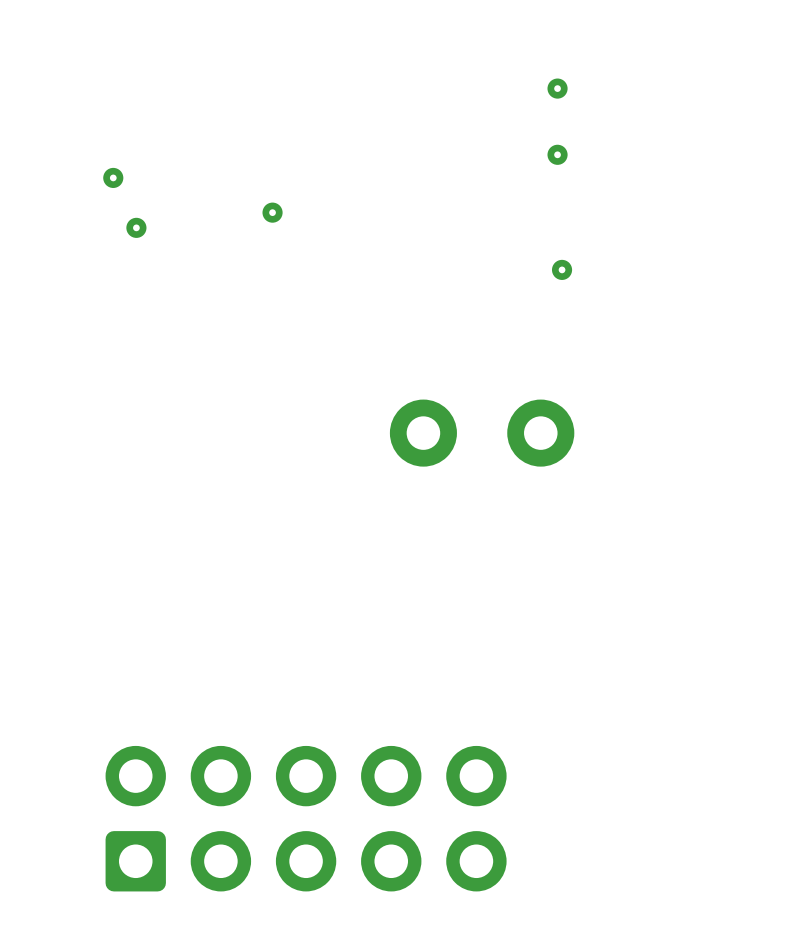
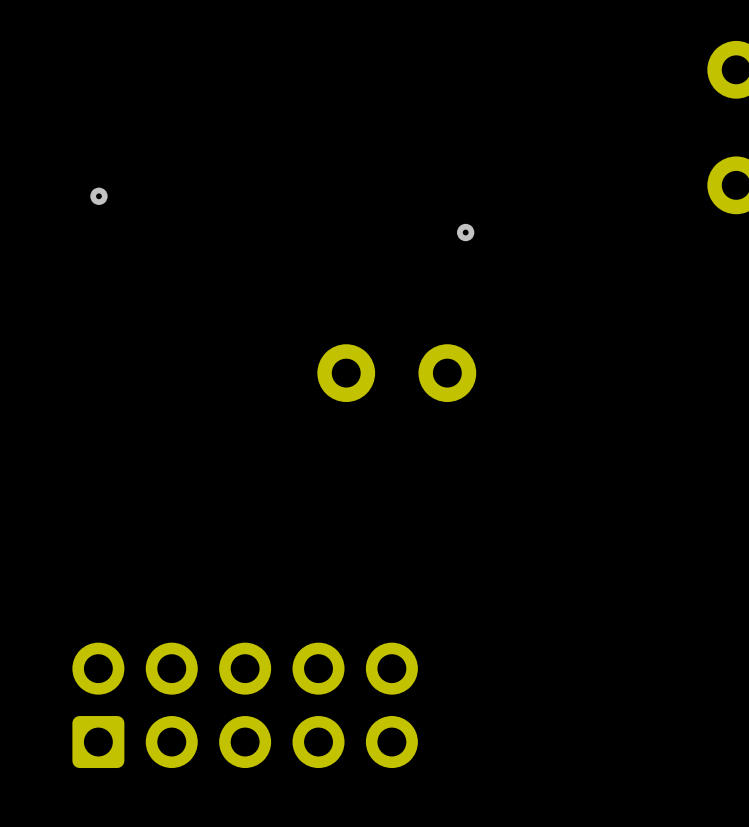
via: (557, 88) -> none
via: (557, 154) -> none
via: (113, 177) -> none
via: (272, 212) -> none

